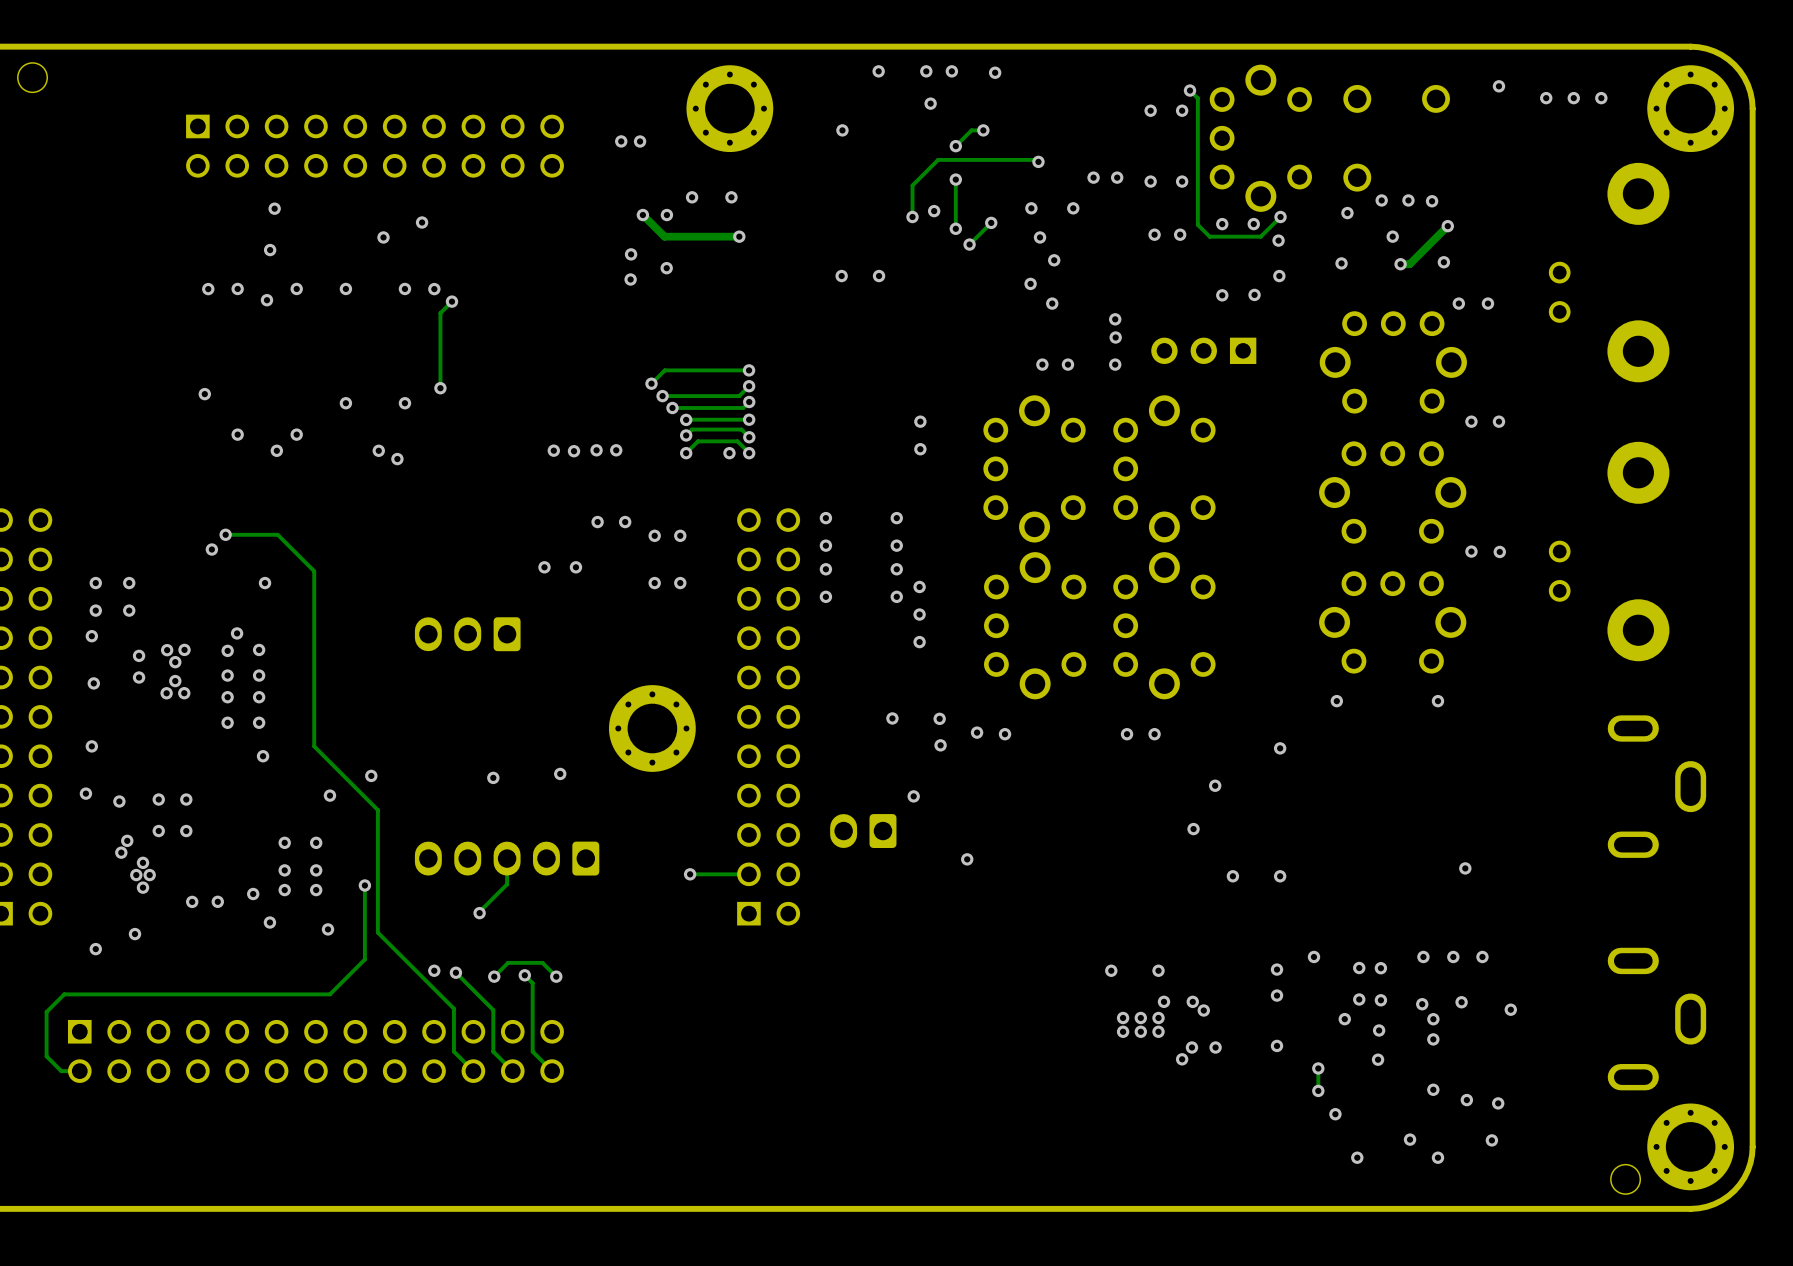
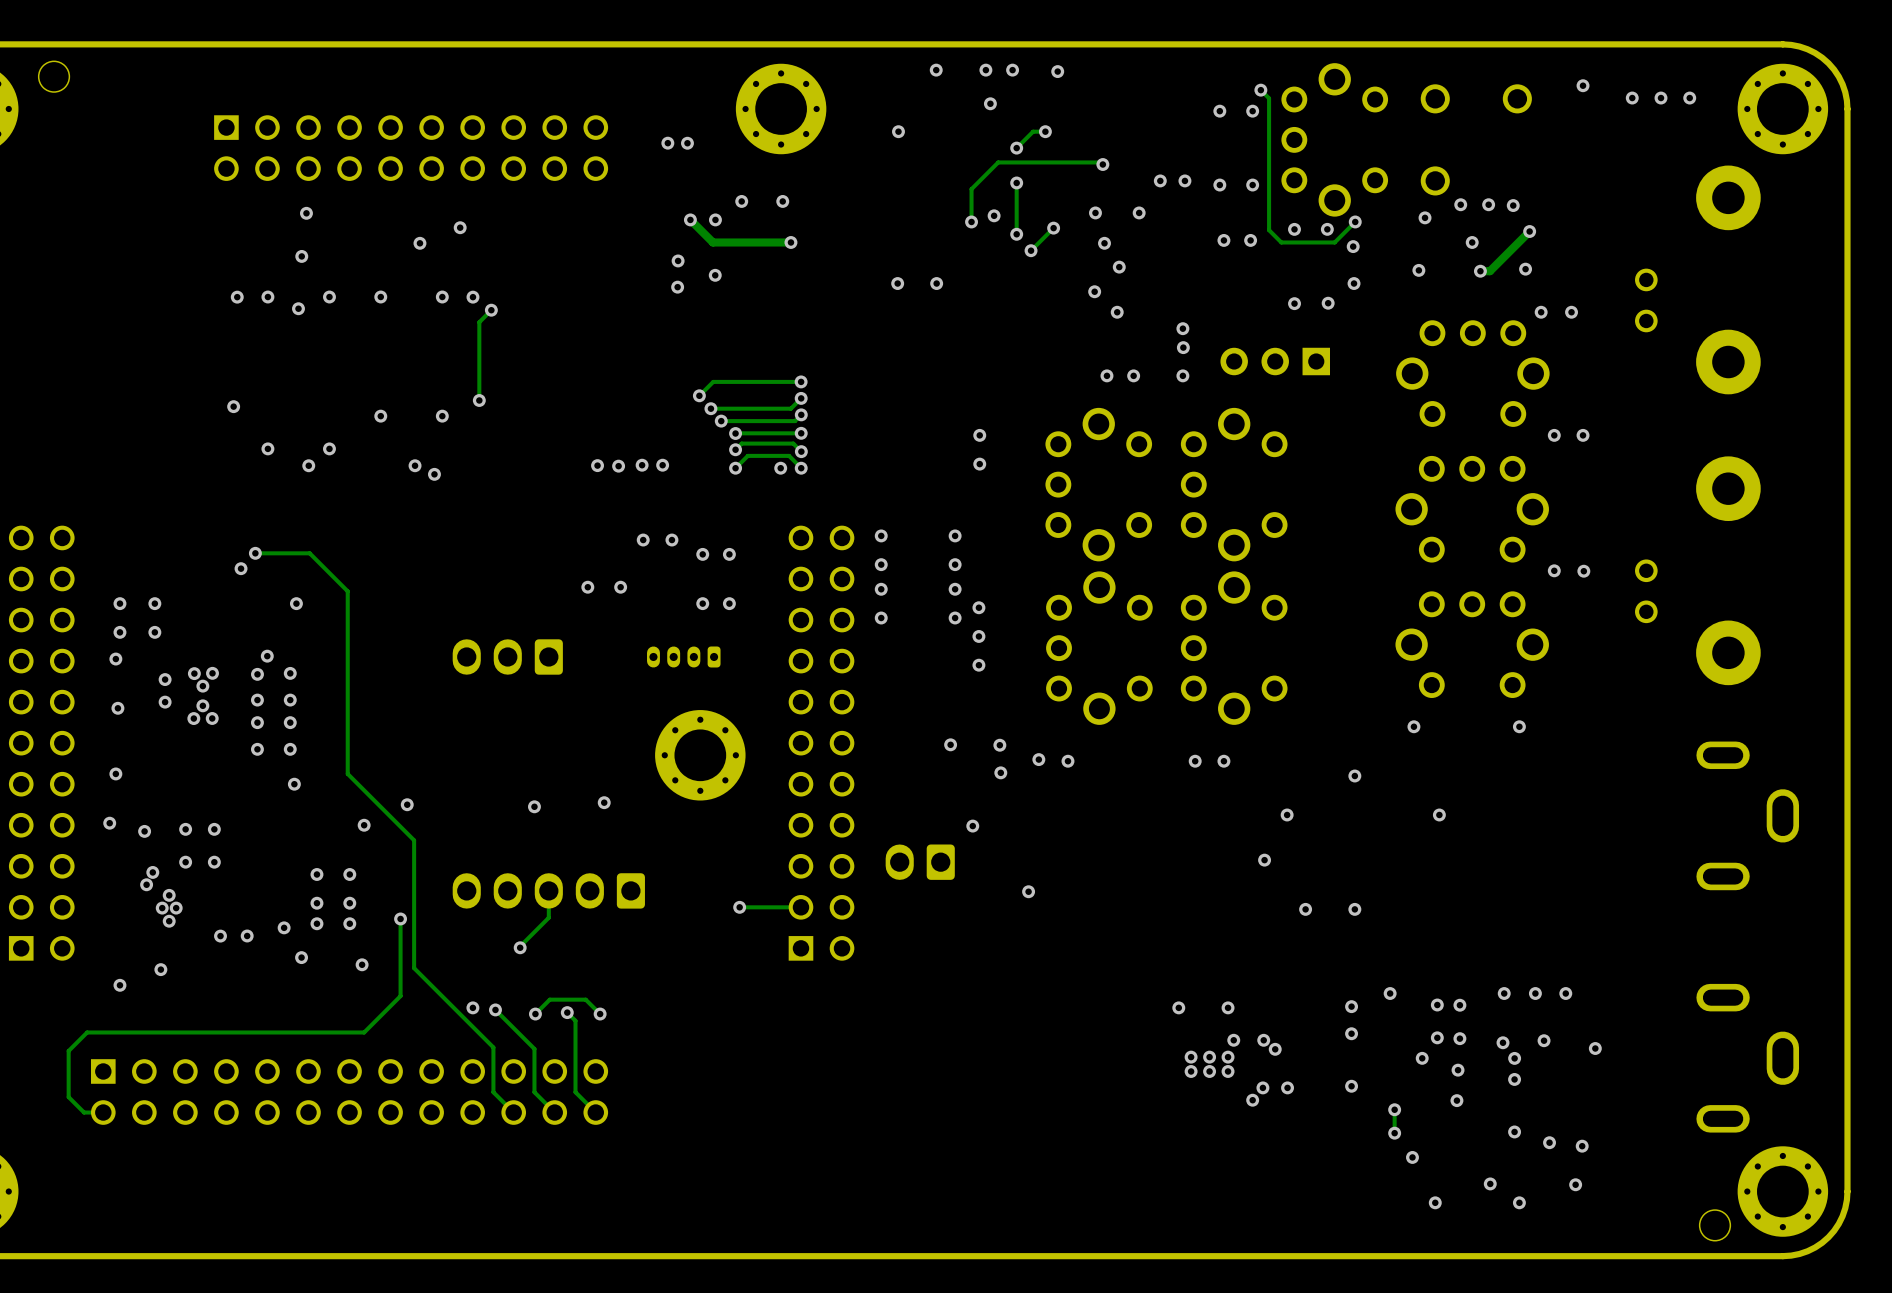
part: none -> (683, 656)
via: none -> (1439, 814)
via: (1465, 868) -> none

